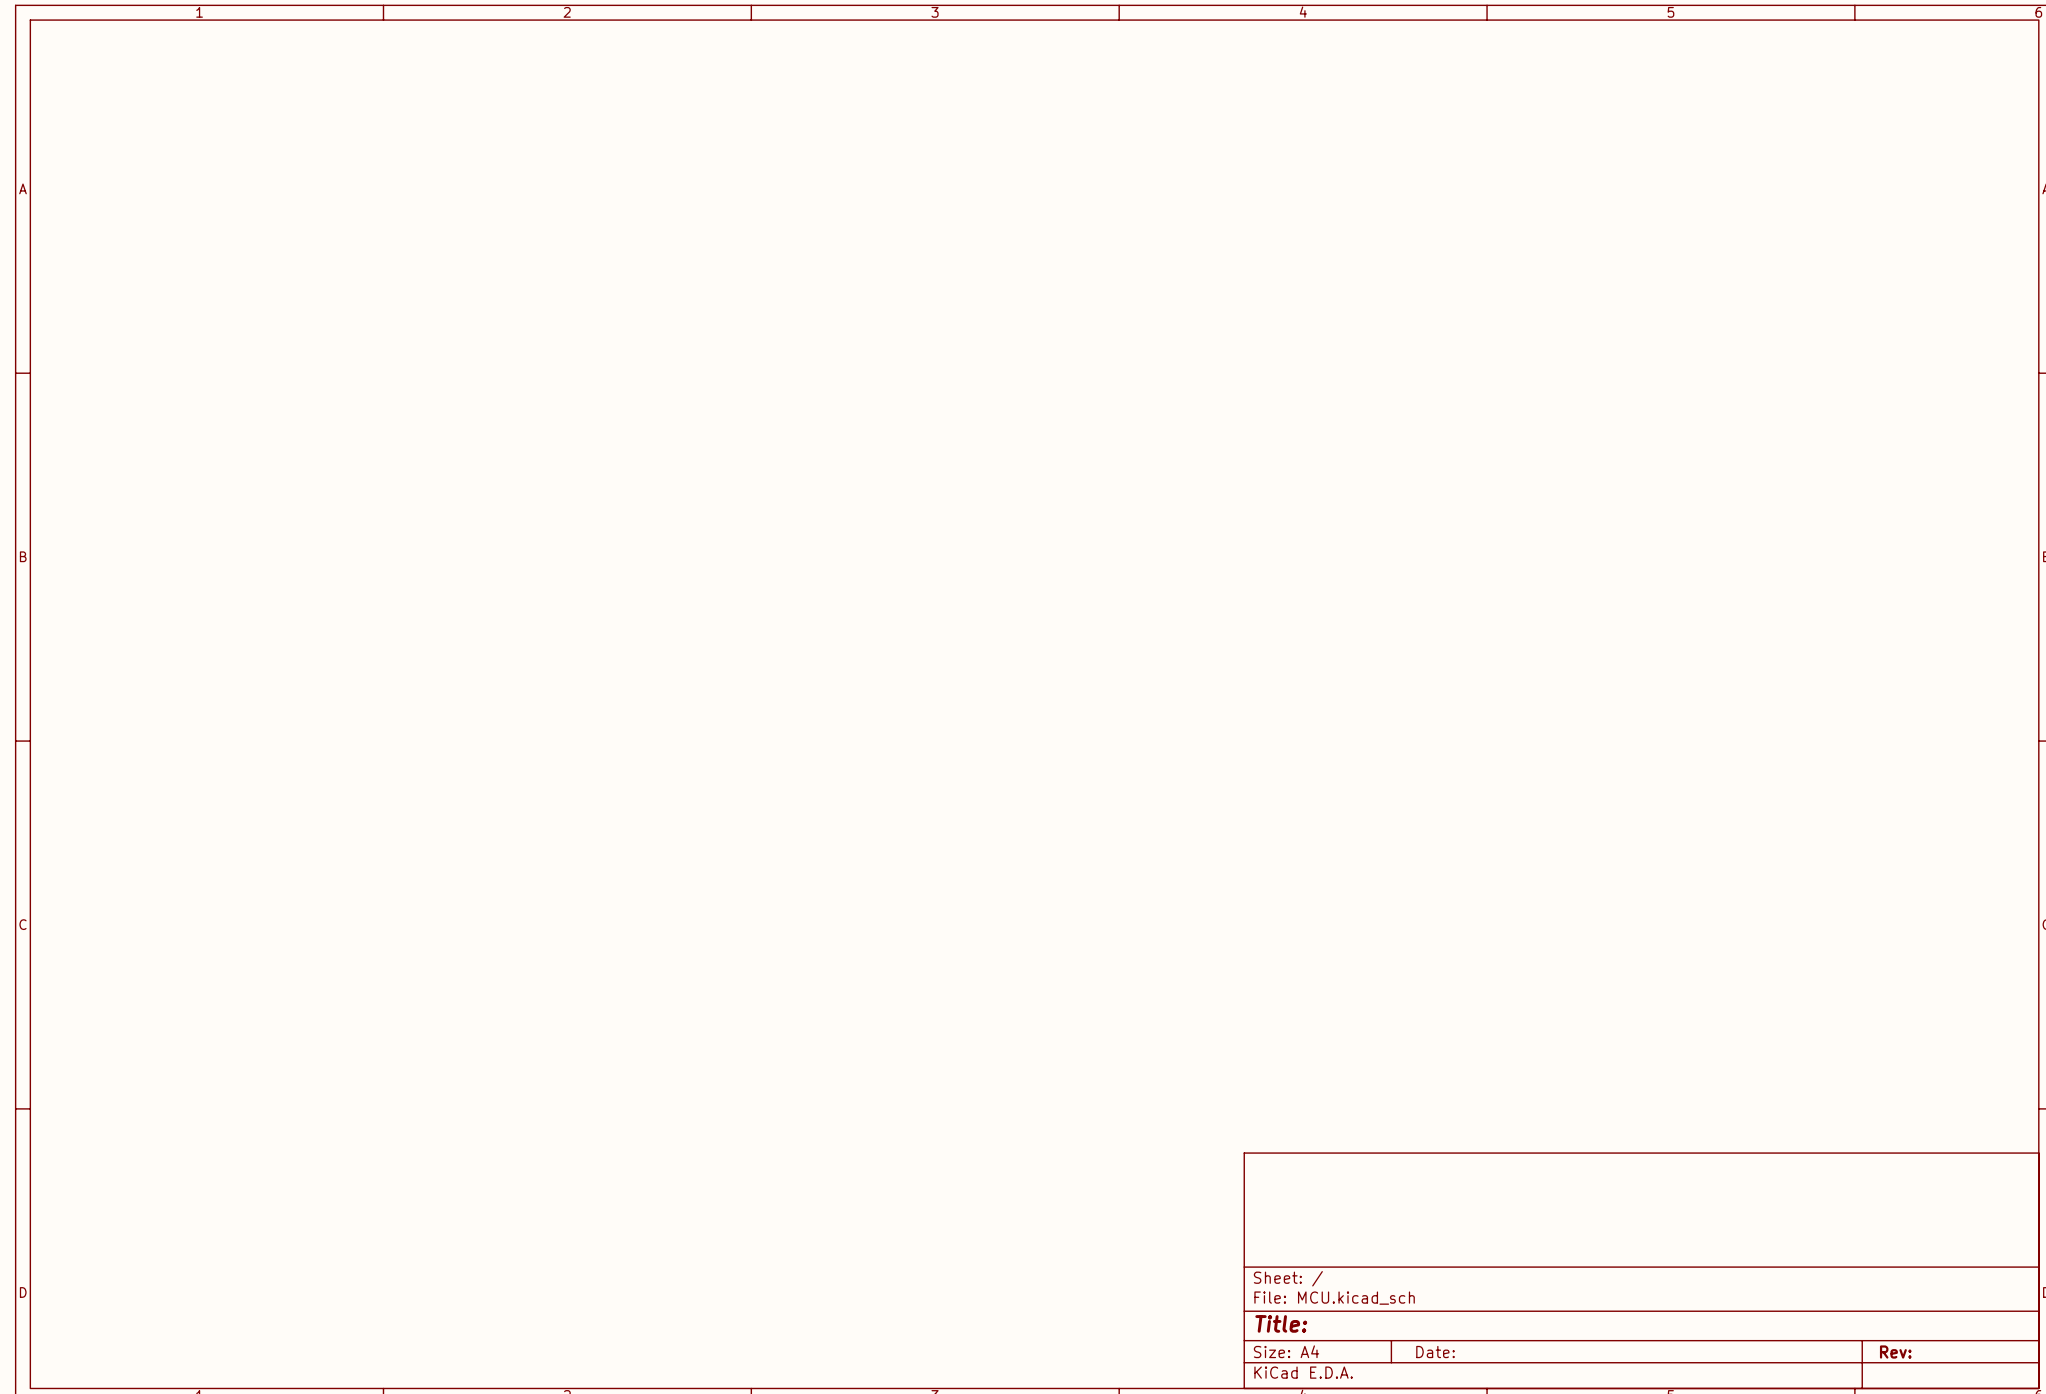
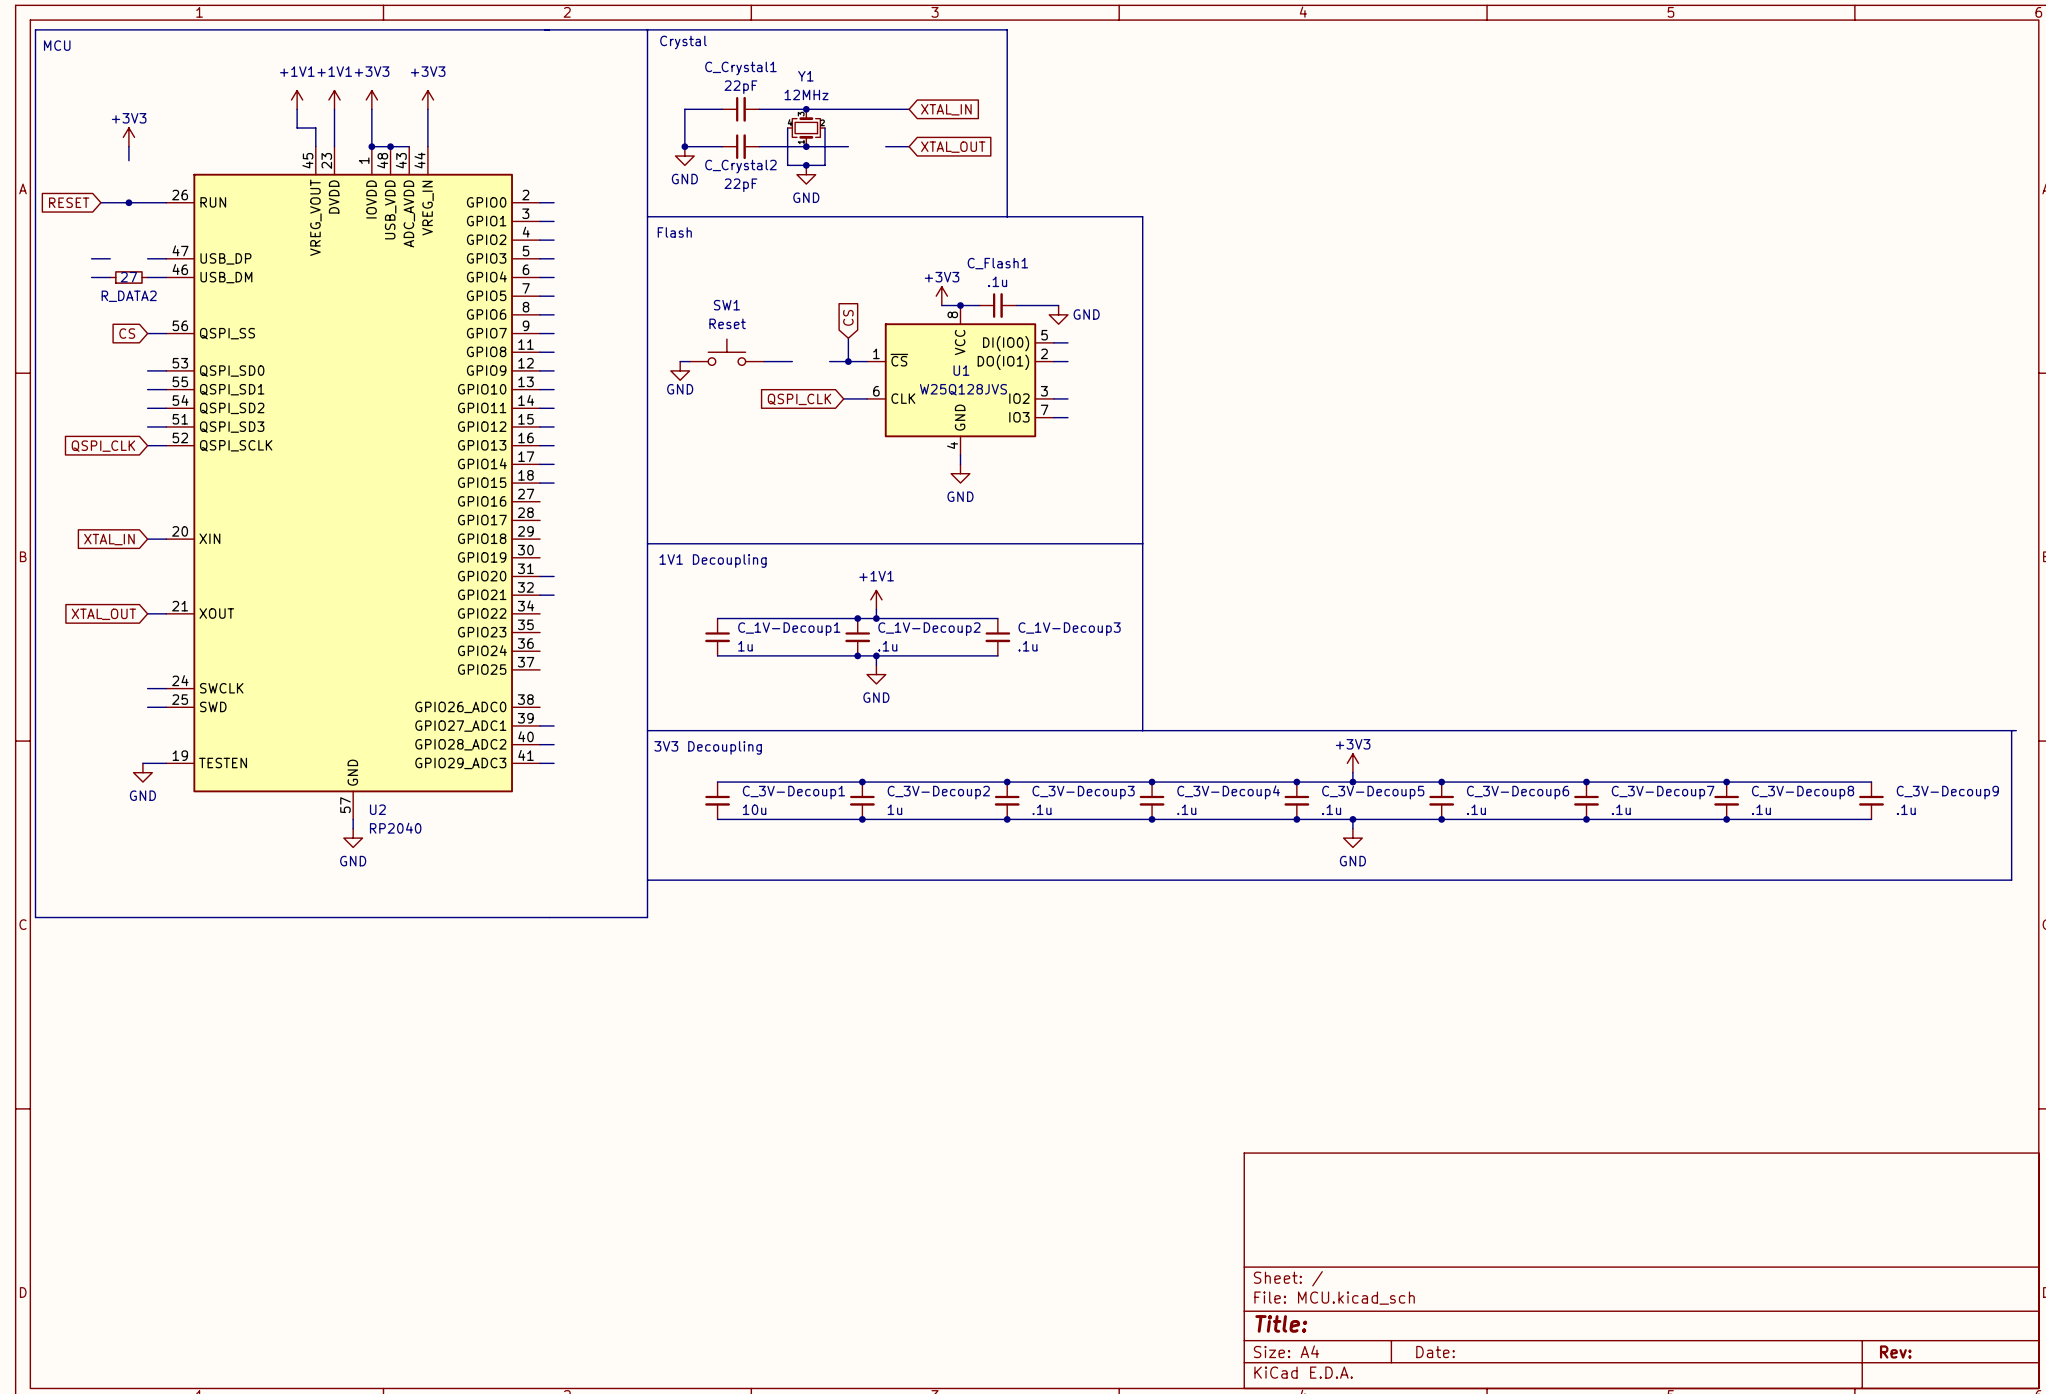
line: none -> (647, 29) (647, 917) (35, 917) (35, 29) (1007, 29) (1007, 216)
text: none -> Crystal (683, 42)
text: none -> MCU (57, 45)
power symbol: none -> +1V1 (297, 99)
power symbol: none -> +1V1 (334, 99)
power symbol: none -> +3V3 (371, 99)
power symbol: none -> +3V3 (427, 99)
wire: none -> (297, 109) (297, 128) (315, 128) (315, 146)
wire: none -> (334, 109) (334, 146)
wire: none -> (371, 109) (371, 146) (409, 146)
wire: none -> (427, 109) (427, 146)
wire: none -> (722, 109) (684, 109) (684, 146) (722, 146)
C_Crystal1: none -> 22pF (740, 109)
wire: none -> (759, 109) (909, 109)
junction: none -> (806, 109)
global label: none -> XTAL_IN (946, 109)
wire: none -> (787, 128) (787, 165) (825, 165) (825, 128)
Y1: none -> 12MHz (806, 128)
power symbol: none -> +3V3 (128, 137)
wire: none -> (128, 146) (128, 160)
junction: none -> (371, 146)
junction: none -> (390, 146)
junction: none -> (684, 146)
C_Crystal2: none -> 22pF (740, 146)
wire: none -> (759, 146) (848, 146)
junction: none -> (806, 146)
wire: none -> (885, 146) (909, 146)
global label: none -> XTAL_OUT (953, 147)
power symbol: none -> GND (684, 156)
junction: none -> (806, 165)
power symbol: none -> GND (806, 174)
global label: none -> RESET (69, 202)
wire: none -> (100, 202) (166, 202)
junction: none -> (128, 202)
wire: none -> (540, 202) (554, 202)
line: none -> (647, 216) (1142, 216) (1142, 730)
wire: none -> (540, 221) (554, 221)
text: none -> Flash (674, 232)
wire: none -> (540, 240) (554, 240)
wire: none -> (91, 258) (110, 258)
wire: none -> (147, 258) (166, 258)
wire: none -> (540, 258) (554, 258)
wire: none -> (91, 277) (110, 277)
R_DATA2: none -> 27 (128, 277)
wire: none -> (147, 277) (166, 277)
wire: none -> (540, 277) (554, 277)
wire: none -> (540, 296) (554, 296)
power symbol: none -> +3V3 (941, 296)
wire: none -> (941, 305) (979, 305)
junction: none -> (960, 305)
C_Flash1: none -> .1u (997, 305)
wire: none -> (1016, 305) (1058, 305)
wire: none -> (540, 314) (554, 314)
power symbol: none -> GND (1058, 314)
global label: none -> CS (848, 317)
global label: none -> CS (127, 333)
wire: none -> (147, 333) (166, 333)
wire: none -> (540, 333) (554, 333)
wire: none -> (848, 338) (848, 361)
wire: none -> (1053, 342) (1067, 342)
wire: none -> (540, 352) (554, 352)
SW1: none -> Reset (726, 352)
wire: none -> (680, 361) (689, 361)
wire: none -> (764, 361) (792, 361)
wire: none -> (829, 361) (867, 361)
junction: none -> (848, 361)
wire: none -> (1053, 361) (1067, 361)
wire: none -> (147, 370) (166, 370)
wire: none -> (540, 370) (554, 370)
power symbol: none -> GND (680, 370)
U1: none -> W25Q128JVS (960, 380)
wire: none -> (147, 389) (166, 389)
wire: none -> (540, 389) (554, 389)
wire: none -> (843, 398) (867, 398)
wire: none -> (1053, 398) (1067, 398)
global label: none -> QSPI_CLK (799, 399)
wire: none -> (147, 408) (166, 408)
wire: none -> (540, 408) (554, 408)
wire: none -> (1053, 417) (1067, 417)
wire: none -> (147, 426) (166, 426)
wire: none -> (540, 426) (554, 426)
wire: none -> (147, 445) (166, 445)
wire: none -> (540, 445) (554, 445)
global label: none -> QSPI_CLK (103, 446)
wire: none -> (960, 455) (960, 464)
wire: none -> (540, 464) (554, 464)
power symbol: none -> GND (960, 473)
U2: none -> RP2040 (353, 483)
wire: none -> (540, 483) (554, 483)
global label: none -> XTAL_IN (109, 539)
wire: none -> (147, 539) (166, 539)
line: none -> (647, 543) (1142, 543)
text: none -> 1V1 Decoupling (713, 561)
wire: none -> (540, 576) (554, 576)
wire: none -> (540, 595) (554, 595)
power symbol: none -> +1V1 (876, 599)
wire: none -> (876, 609) (876, 618)
wire: none -> (147, 613) (166, 613)
global label: none -> XTAL_OUT (103, 614)
wire: none -> (717, 618) (997, 618)
junction: none -> (857, 618)
junction: none -> (876, 618)
C_1V-Decoup1: none -> 1u (717, 637)
C_1V-Decoup2: none -> .1u (857, 637)
C_1V-Decoup3: none -> .1u (997, 637)
wire: none -> (717, 655) (997, 655)
junction: none -> (857, 655)
wire: none -> (876, 655) (876, 665)
junction: none -> (876, 655)
power symbol: none -> GND (876, 674)
wire: none -> (147, 688) (166, 688)
wire: none -> (147, 707) (166, 707)
wire: none -> (540, 725) (554, 725)
line: none -> (647, 730) (2016, 730)
line: none -> (2011, 730) (2011, 880) (647, 880)
wire: none -> (540, 744) (554, 744)
text: none -> 3V3 Decoupling (708, 747)
wire: none -> (142, 763) (166, 763)
wire: none -> (540, 763) (554, 763)
power symbol: none -> +3V3 (1352, 763)
power symbol: none -> GND (142, 772)
wire: none -> (1352, 772) (1352, 782)
wire: none -> (717, 782) (1871, 782)
junction: none -> (862, 782)
junction: none -> (1007, 782)
junction: none -> (1152, 782)
junction: none -> (1296, 782)
junction: none -> (1352, 782)
junction: none -> (1441, 782)
junction: none -> (1586, 782)
junction: none -> (1726, 782)
C_3V-Decoup1: none -> 10u (717, 800)
C_3V-Decoup2: none -> 1u (862, 800)
C_3V-Decoup3: none -> .1u (1007, 800)
C_3V-Decoup4: none -> .1u (1152, 800)
C_3V-Decoup5: none -> .1u (1296, 800)
C_3V-Decoup6: none -> .1u (1441, 800)
C_3V-Decoup7: none -> .1u (1586, 800)
C_3V-Decoup8: none -> .1u (1726, 800)
C_3V-Decoup9: none -> .1u (1871, 800)
wire: none -> (353, 819) (353, 828)
wire: none -> (717, 819) (1871, 819)
junction: none -> (862, 819)
junction: none -> (1007, 819)
junction: none -> (1152, 819)
junction: none -> (1296, 819)
wire: none -> (1352, 819) (1352, 828)
junction: none -> (1352, 819)
junction: none -> (1441, 819)
junction: none -> (1586, 819)
junction: none -> (1726, 819)
power symbol: none -> GND (353, 838)
power symbol: none -> GND (1352, 838)

